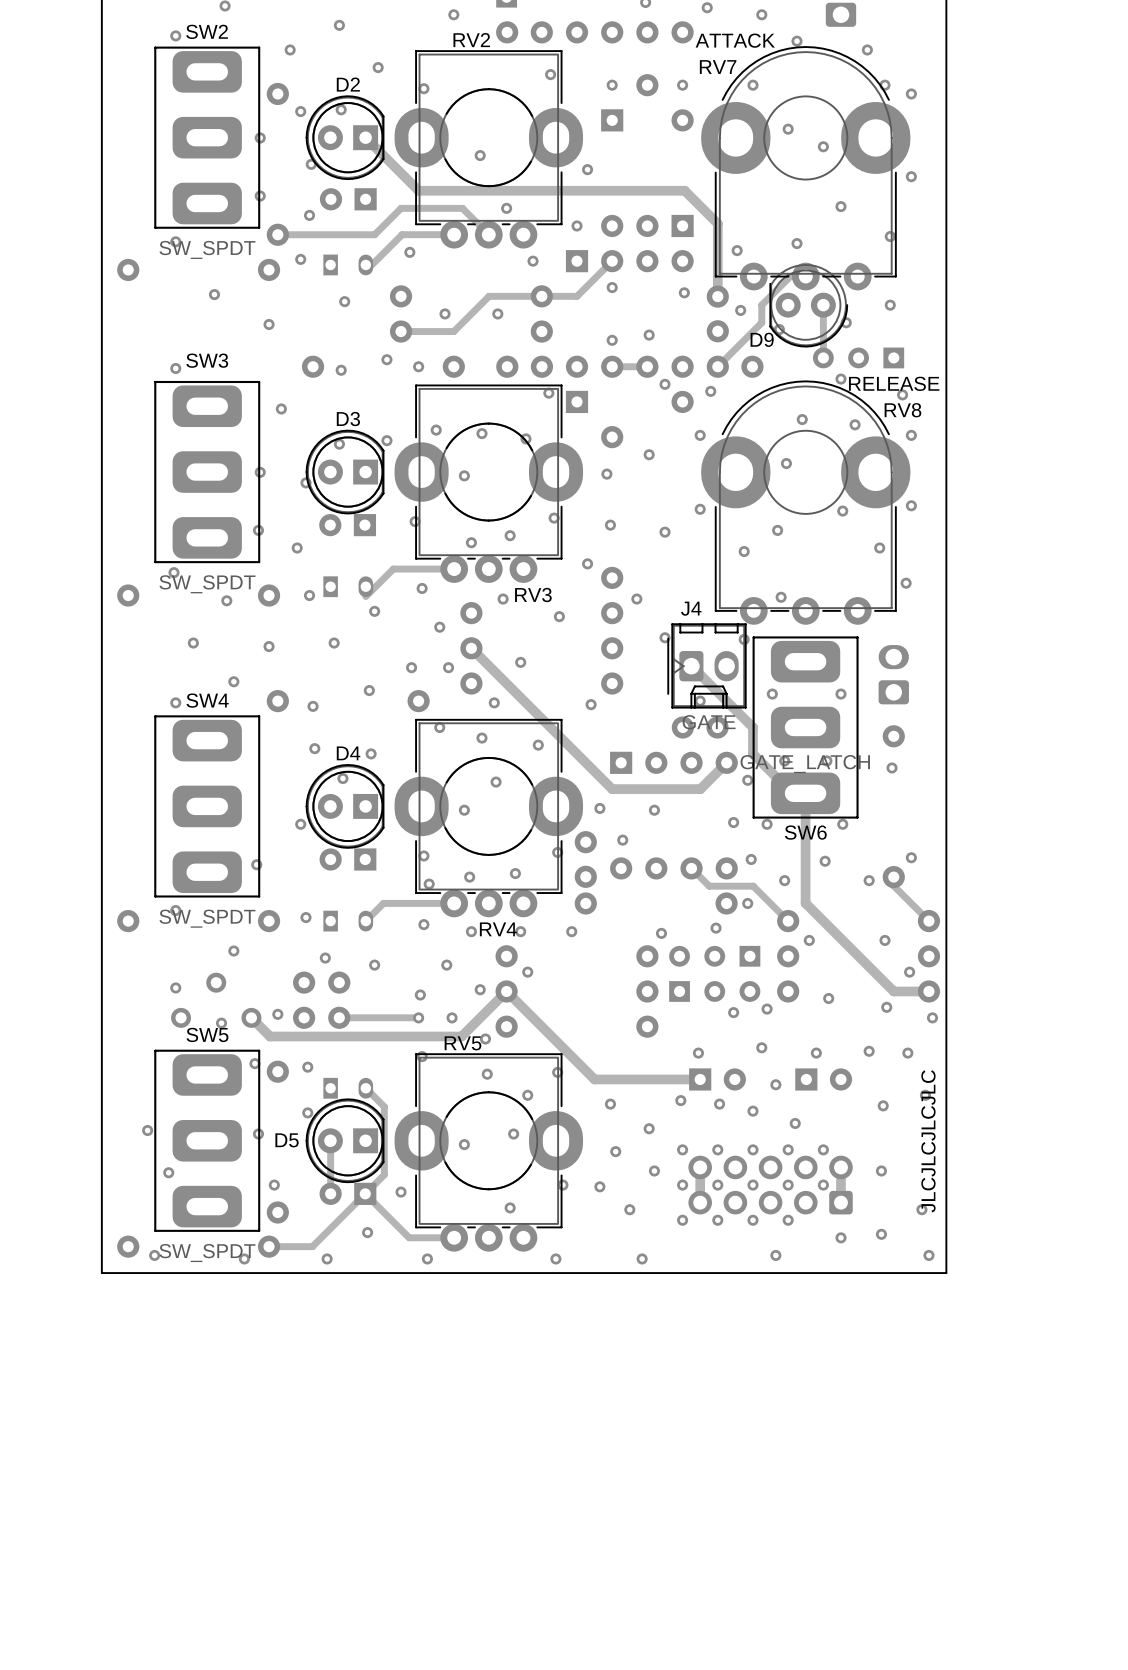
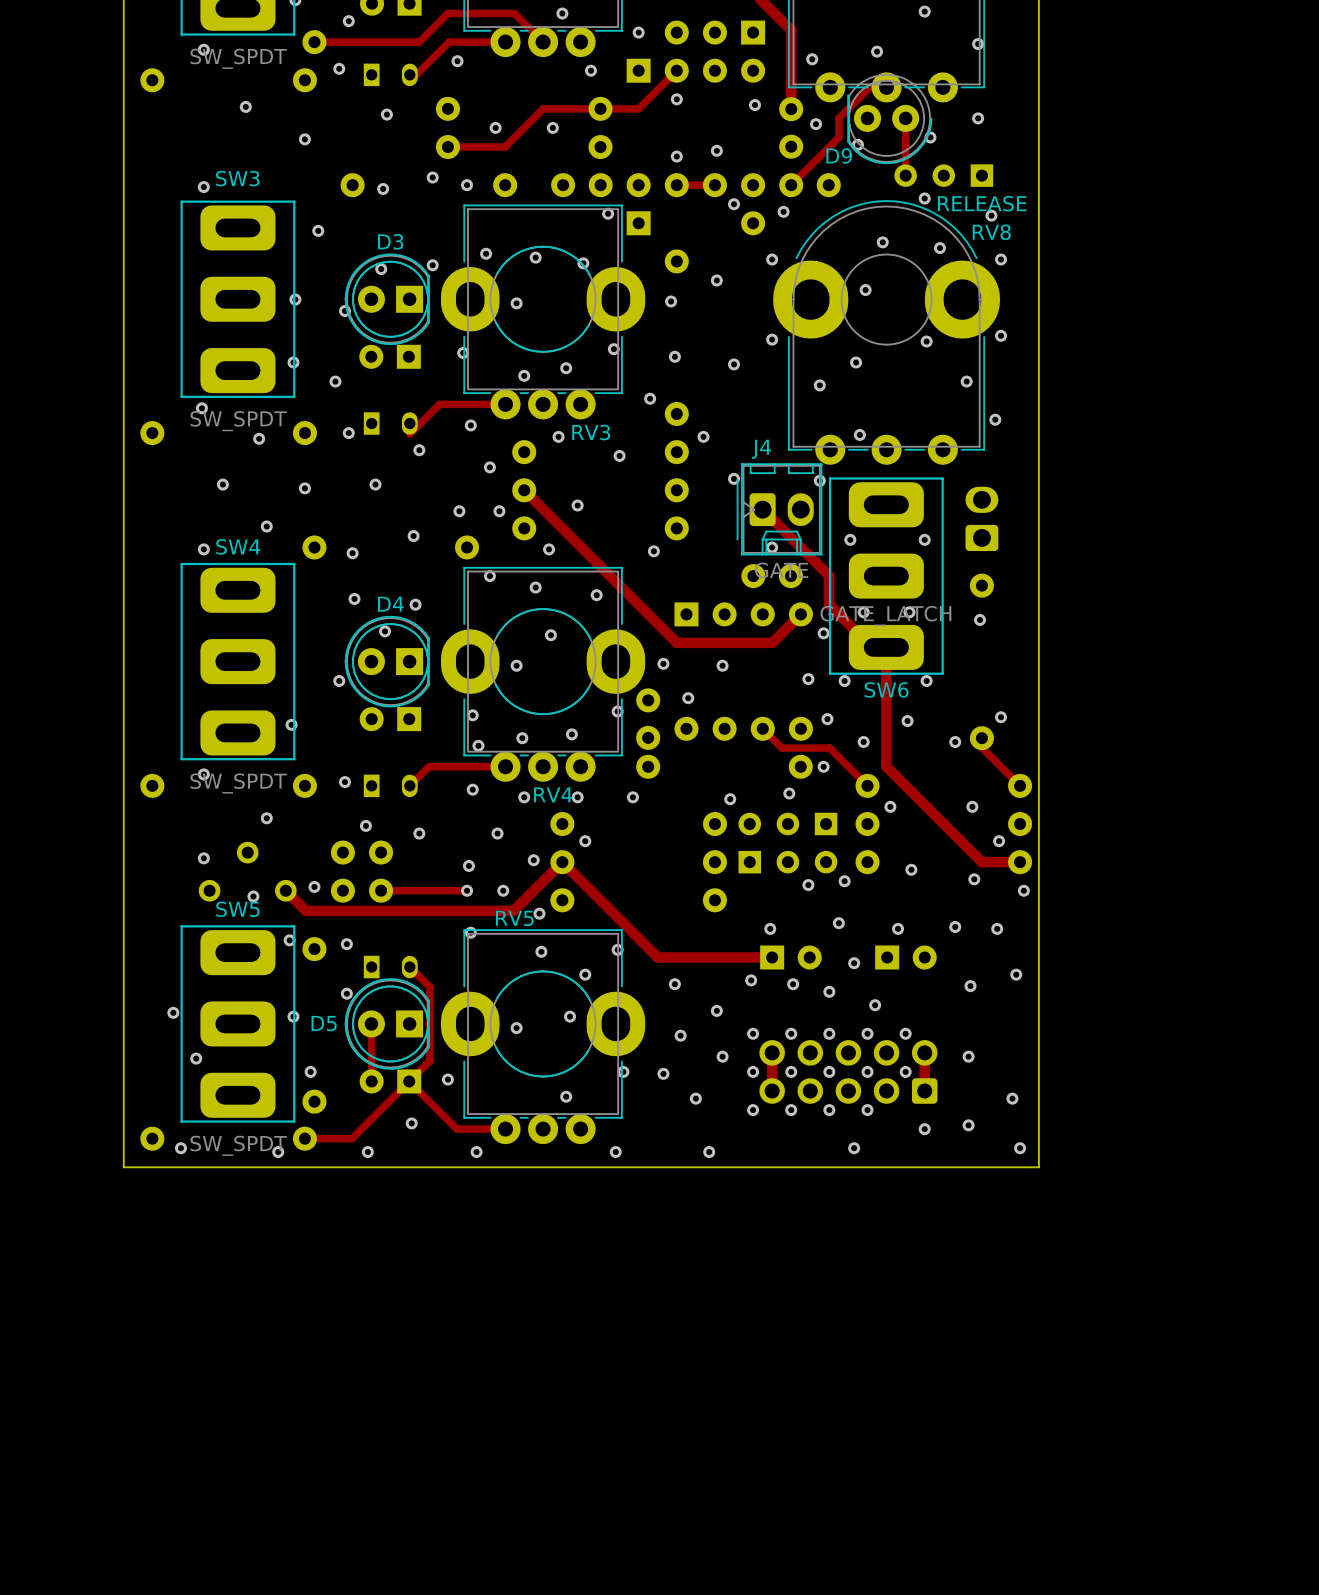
text: JLCJLCJLCJLC (928, 1141) -> none

